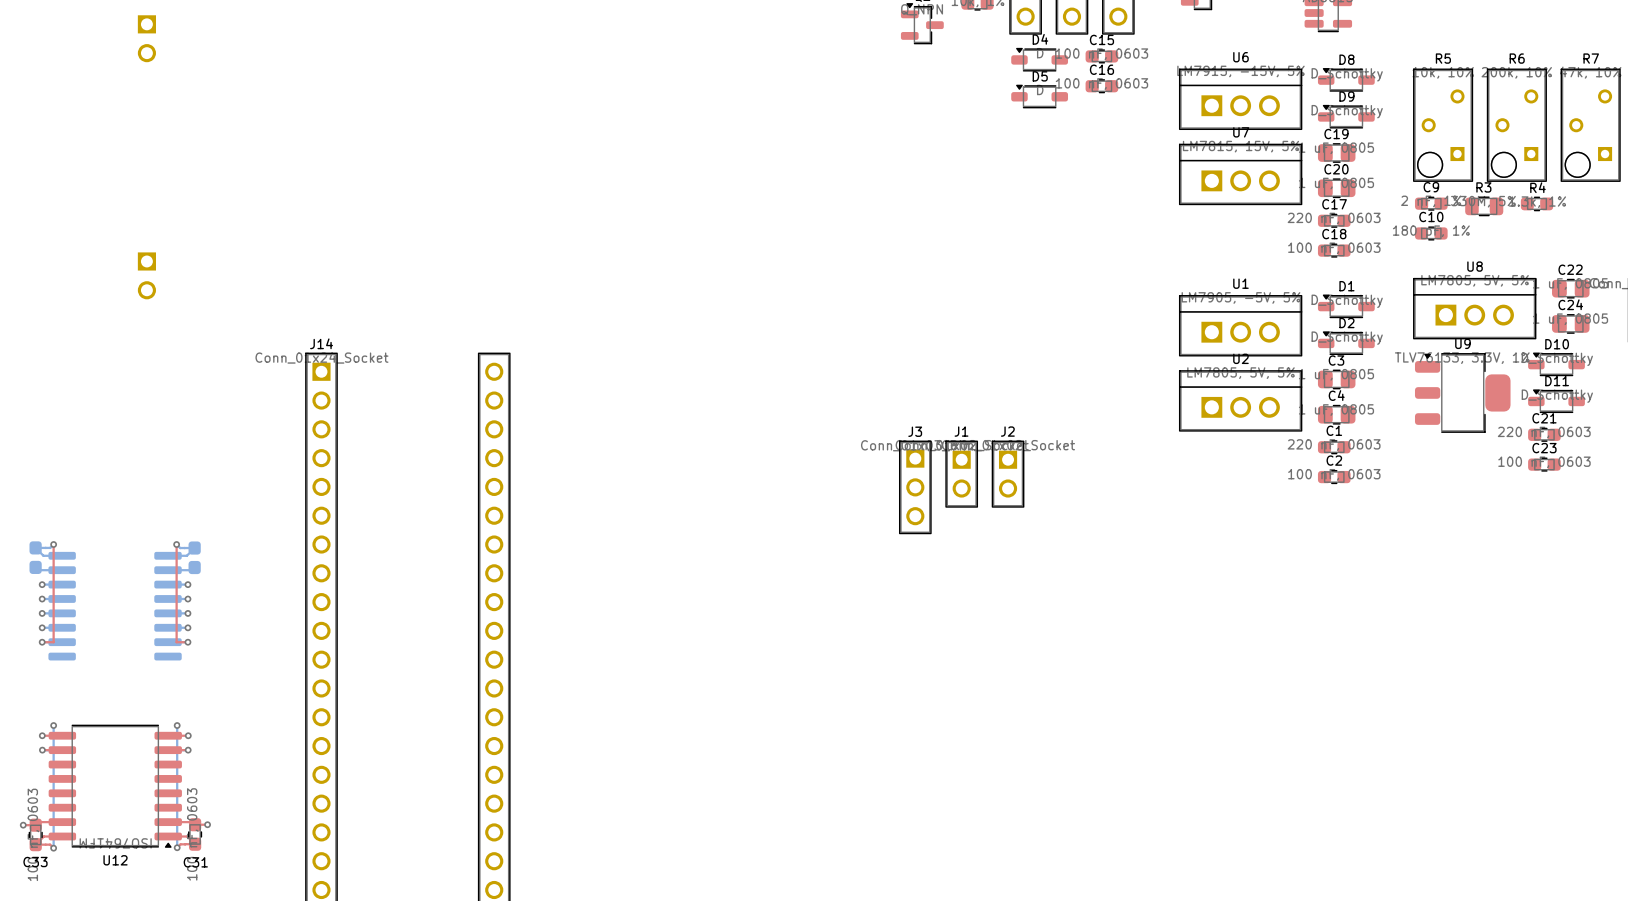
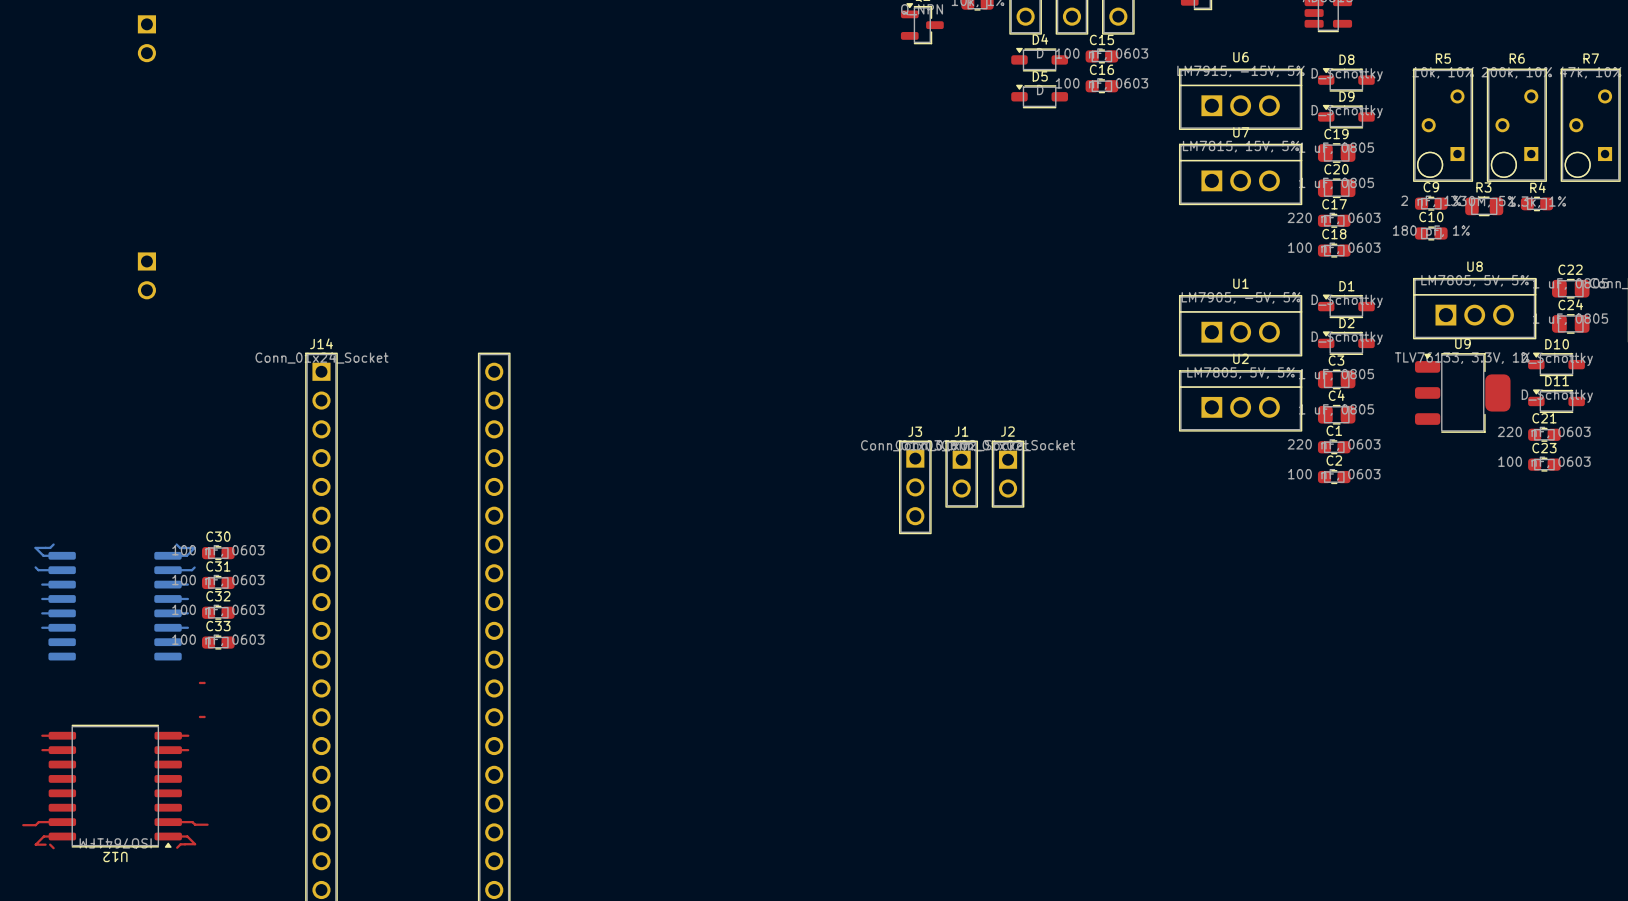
top track: (53, 544) (53, 642) (42, 642) -> none
via: (53, 544) -> none
top track: (176, 544) (176, 642) (187, 642) -> none
via: (176, 544) -> none
C32 side: bottom (35, 557) -> top (218, 612)
C30 side: bottom (194, 557) -> top (218, 553)
via: (42, 584) -> none
via: (187, 584) -> none
via: (42, 599) -> none
via: (187, 599) -> none
via: (42, 613) -> none
via: (187, 613) -> none
via: (42, 627) -> none
via: (187, 627) -> none
via: (42, 642) -> none
via: (187, 642) -> none
part: none -> (202, 682)
part: none -> (202, 716)
bottom track: (53, 725) (53, 848) -> none
via: (53, 725) -> none
bottom track: (177, 725) (177, 847) -> none
via: (177, 725) -> none
via: (42, 735) -> none
via: (188, 735) -> none
via: (42, 750) -> none
via: (188, 750) -> none
via: (207, 824) -> none
via: (23, 825) -> none
C33 rotation: 0° (35, 834) -> 90° clockwise (218, 642)
C33 position: (35, 834) -> (218, 642)
C31 rotation: 0° (195, 834) -> 90° clockwise (218, 582)
C31 position: (195, 834) -> (218, 582)
part: (47, 844) -> none
via: (177, 847) -> none
via: (53, 848) -> none
U12 name rotation: 0° (115, 860) -> 180° (115, 856)
C33 name position: C33 (35, 862) -> C33 (218, 626)
C31 name position: C31 (195, 862) -> C31 (218, 566)

